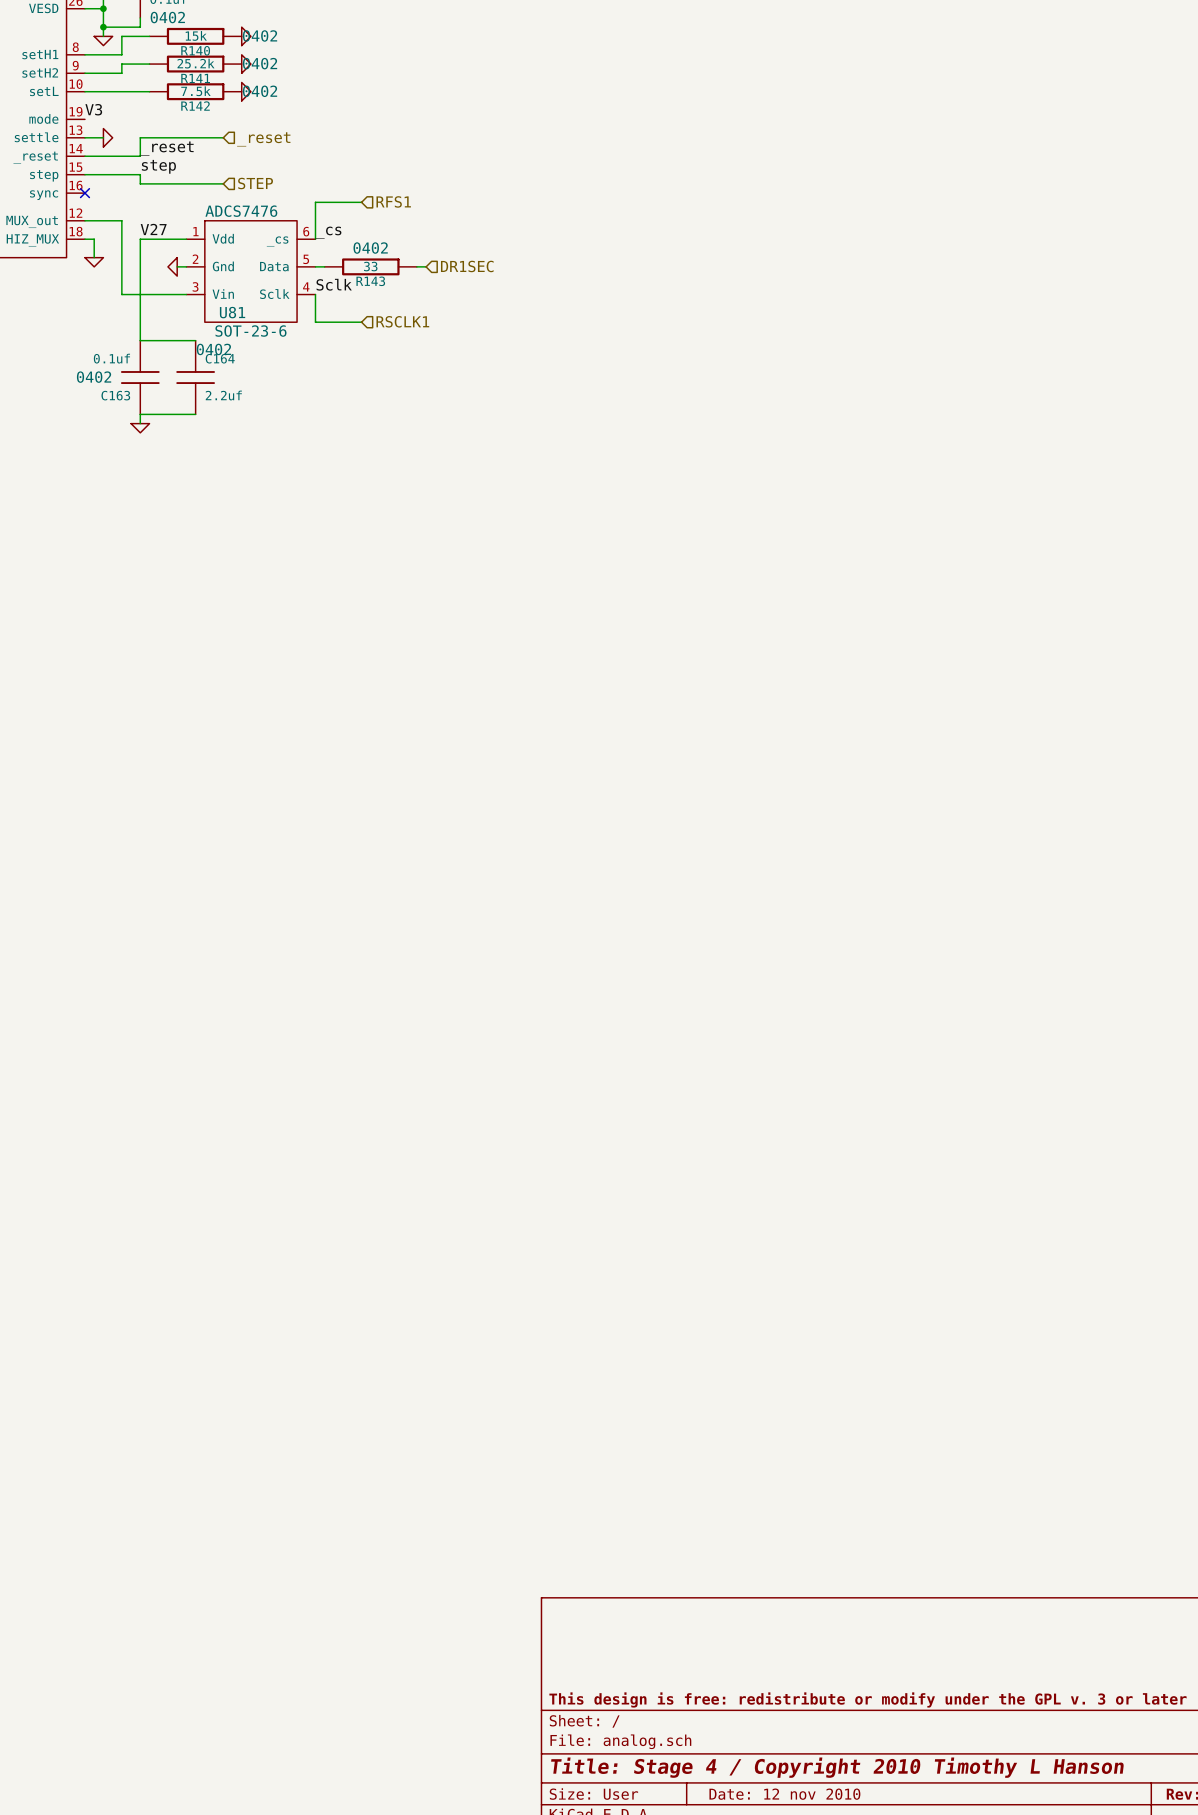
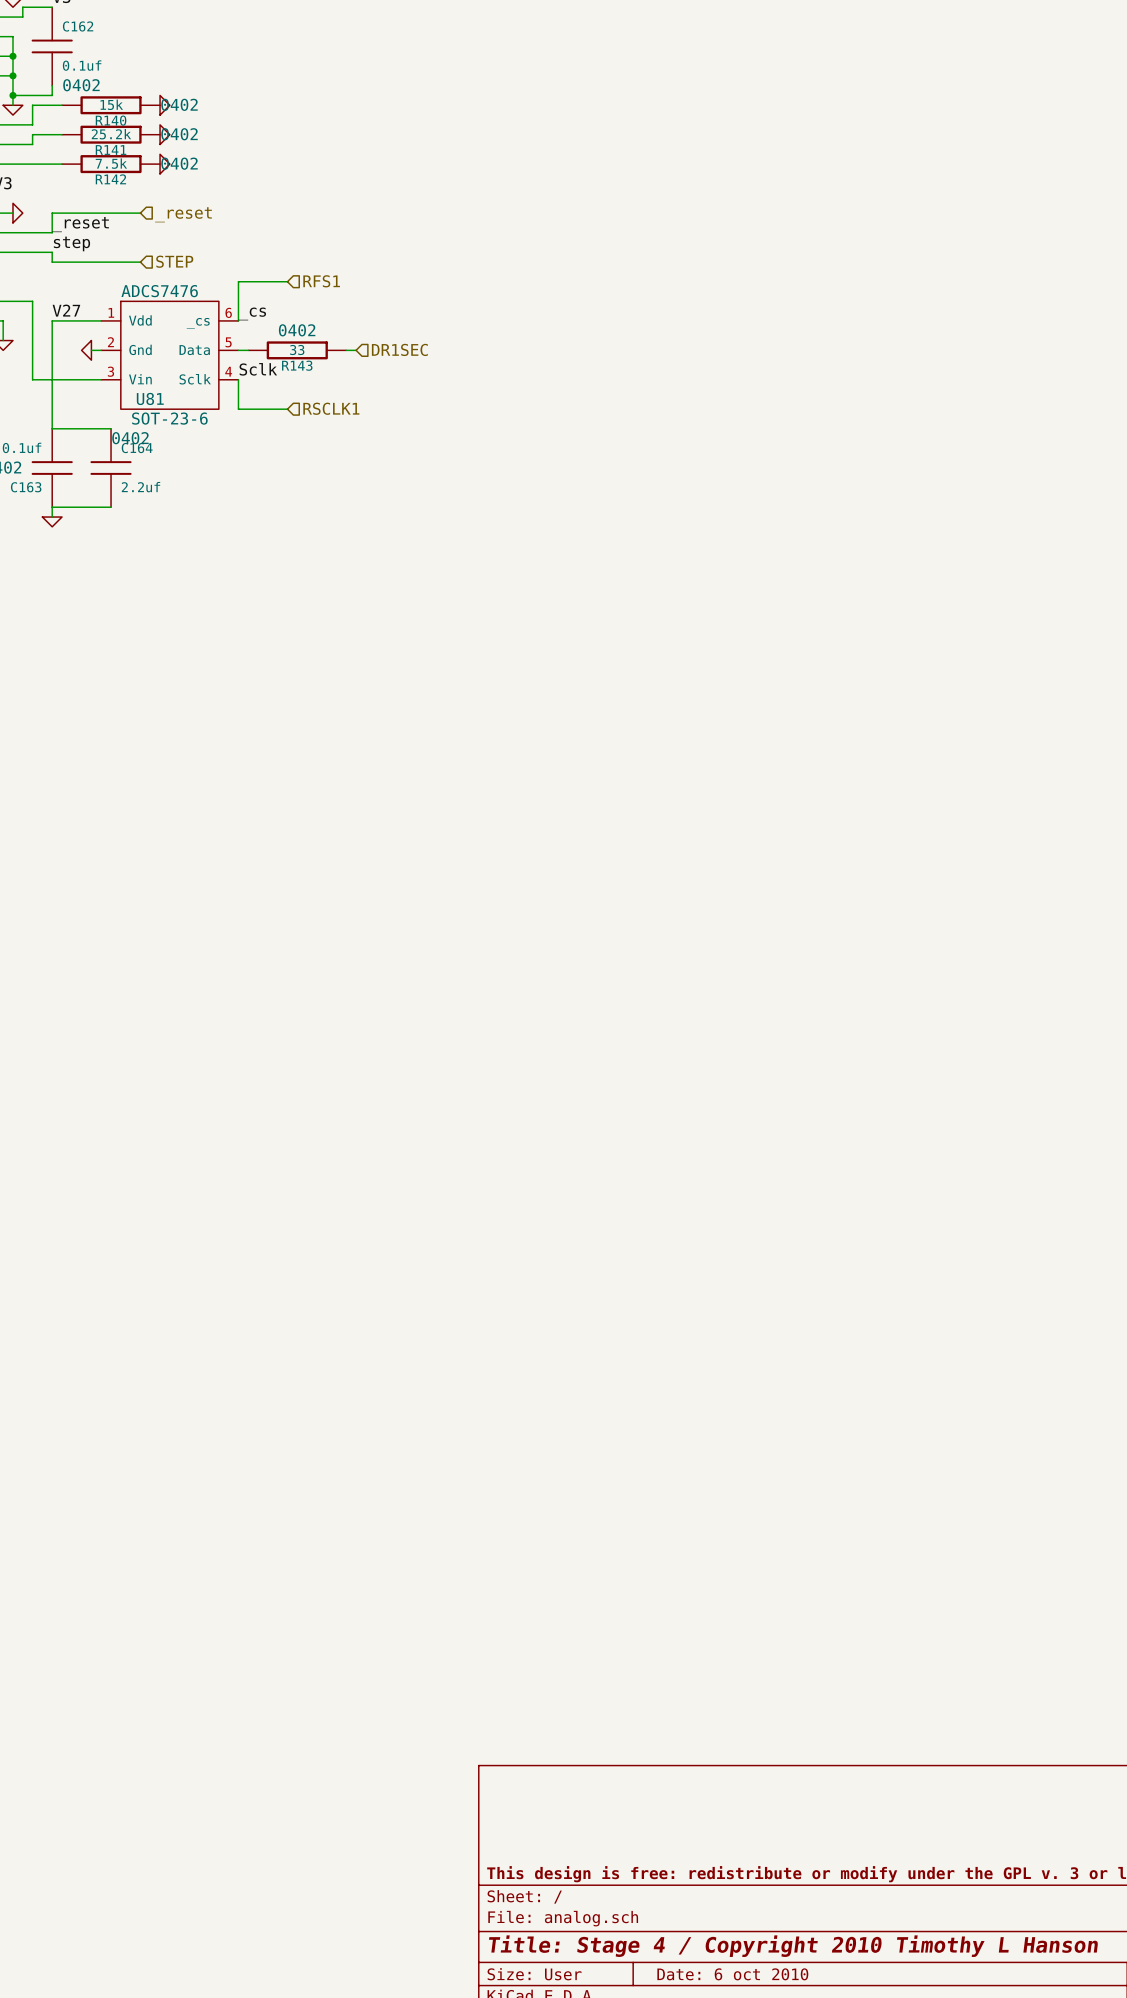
title block: Date: 12 nov 2010 (784, 1794) -> Date: 6 oct 2010 (732, 1974)

